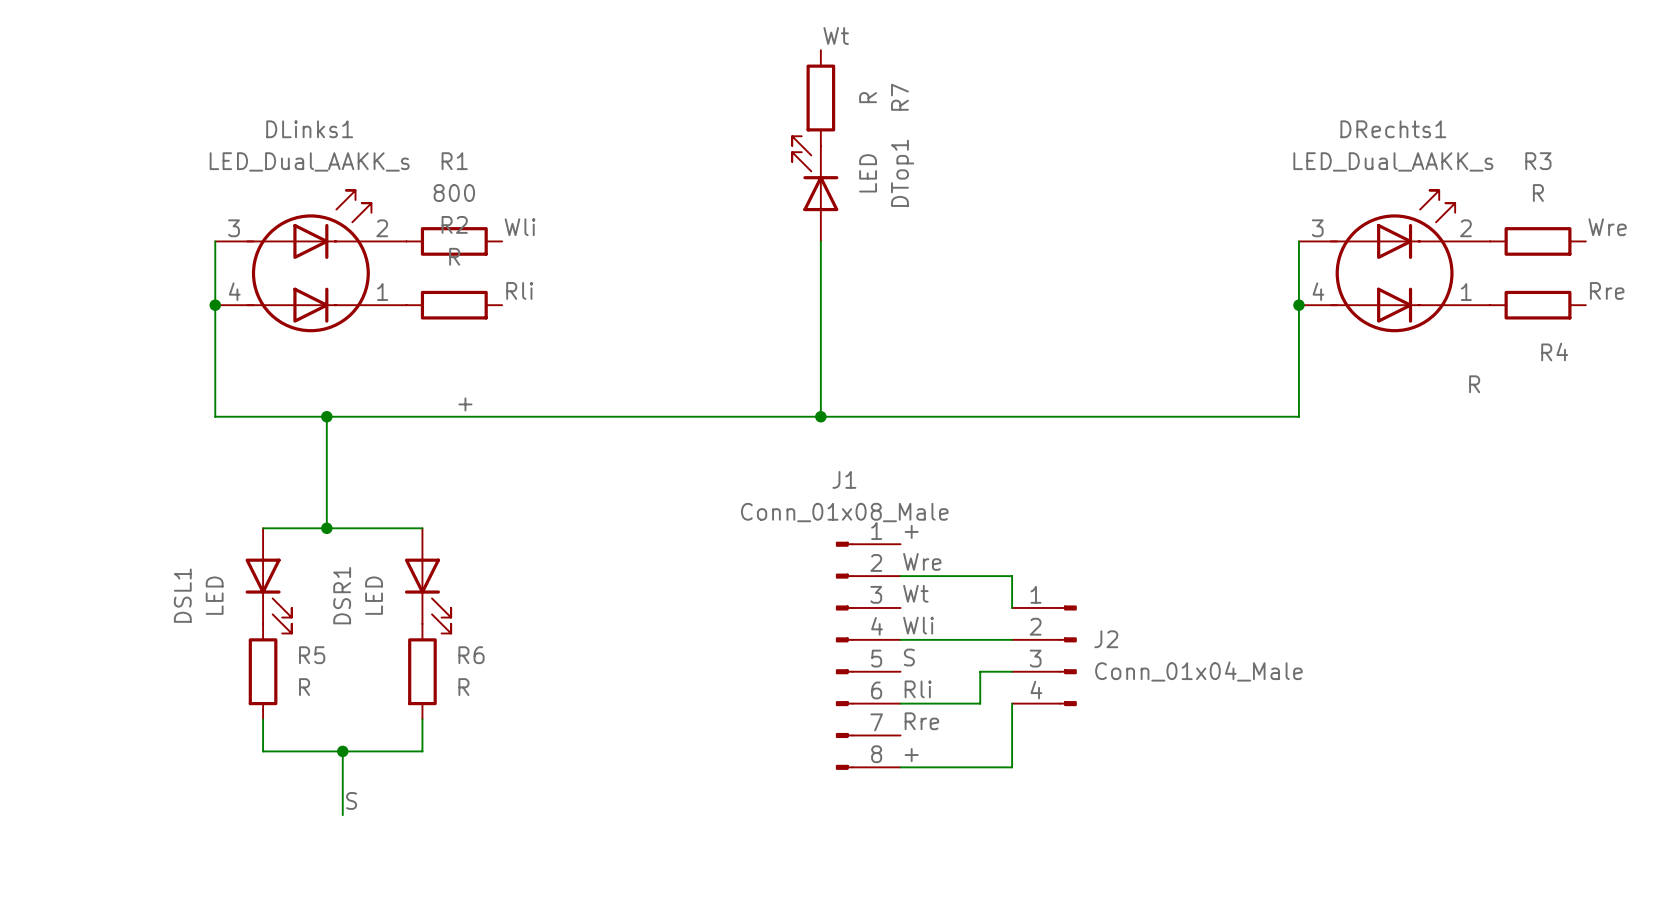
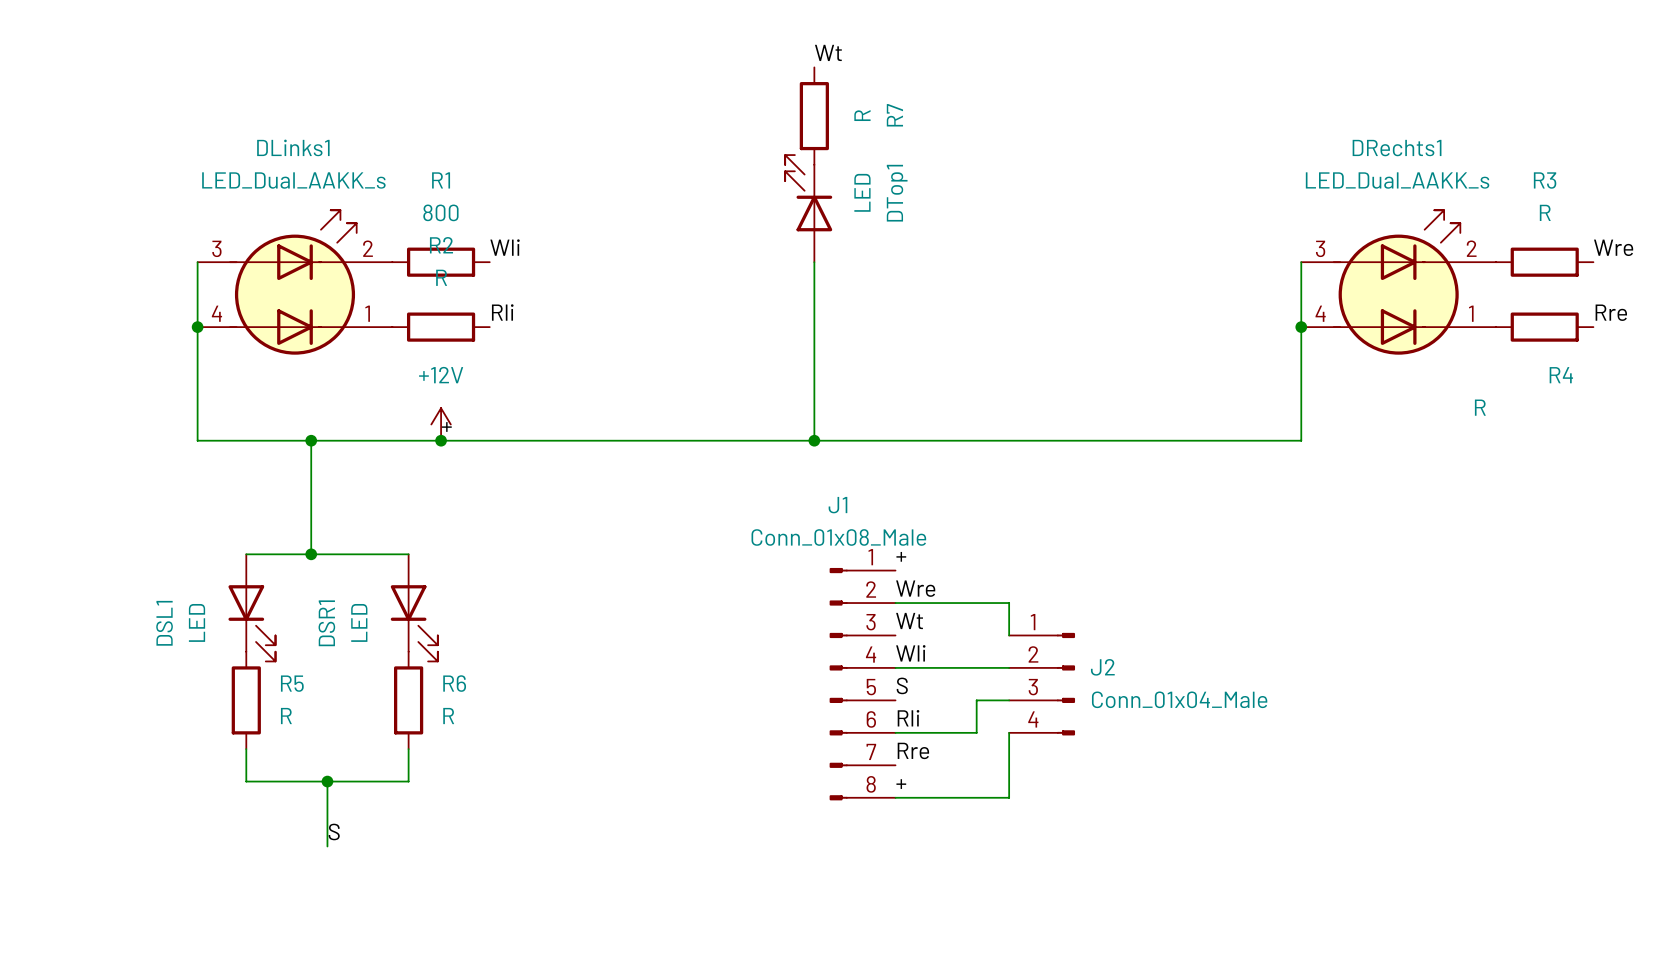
power symbol: none -> +12V (441, 424)
junction: none -> (441, 440)

